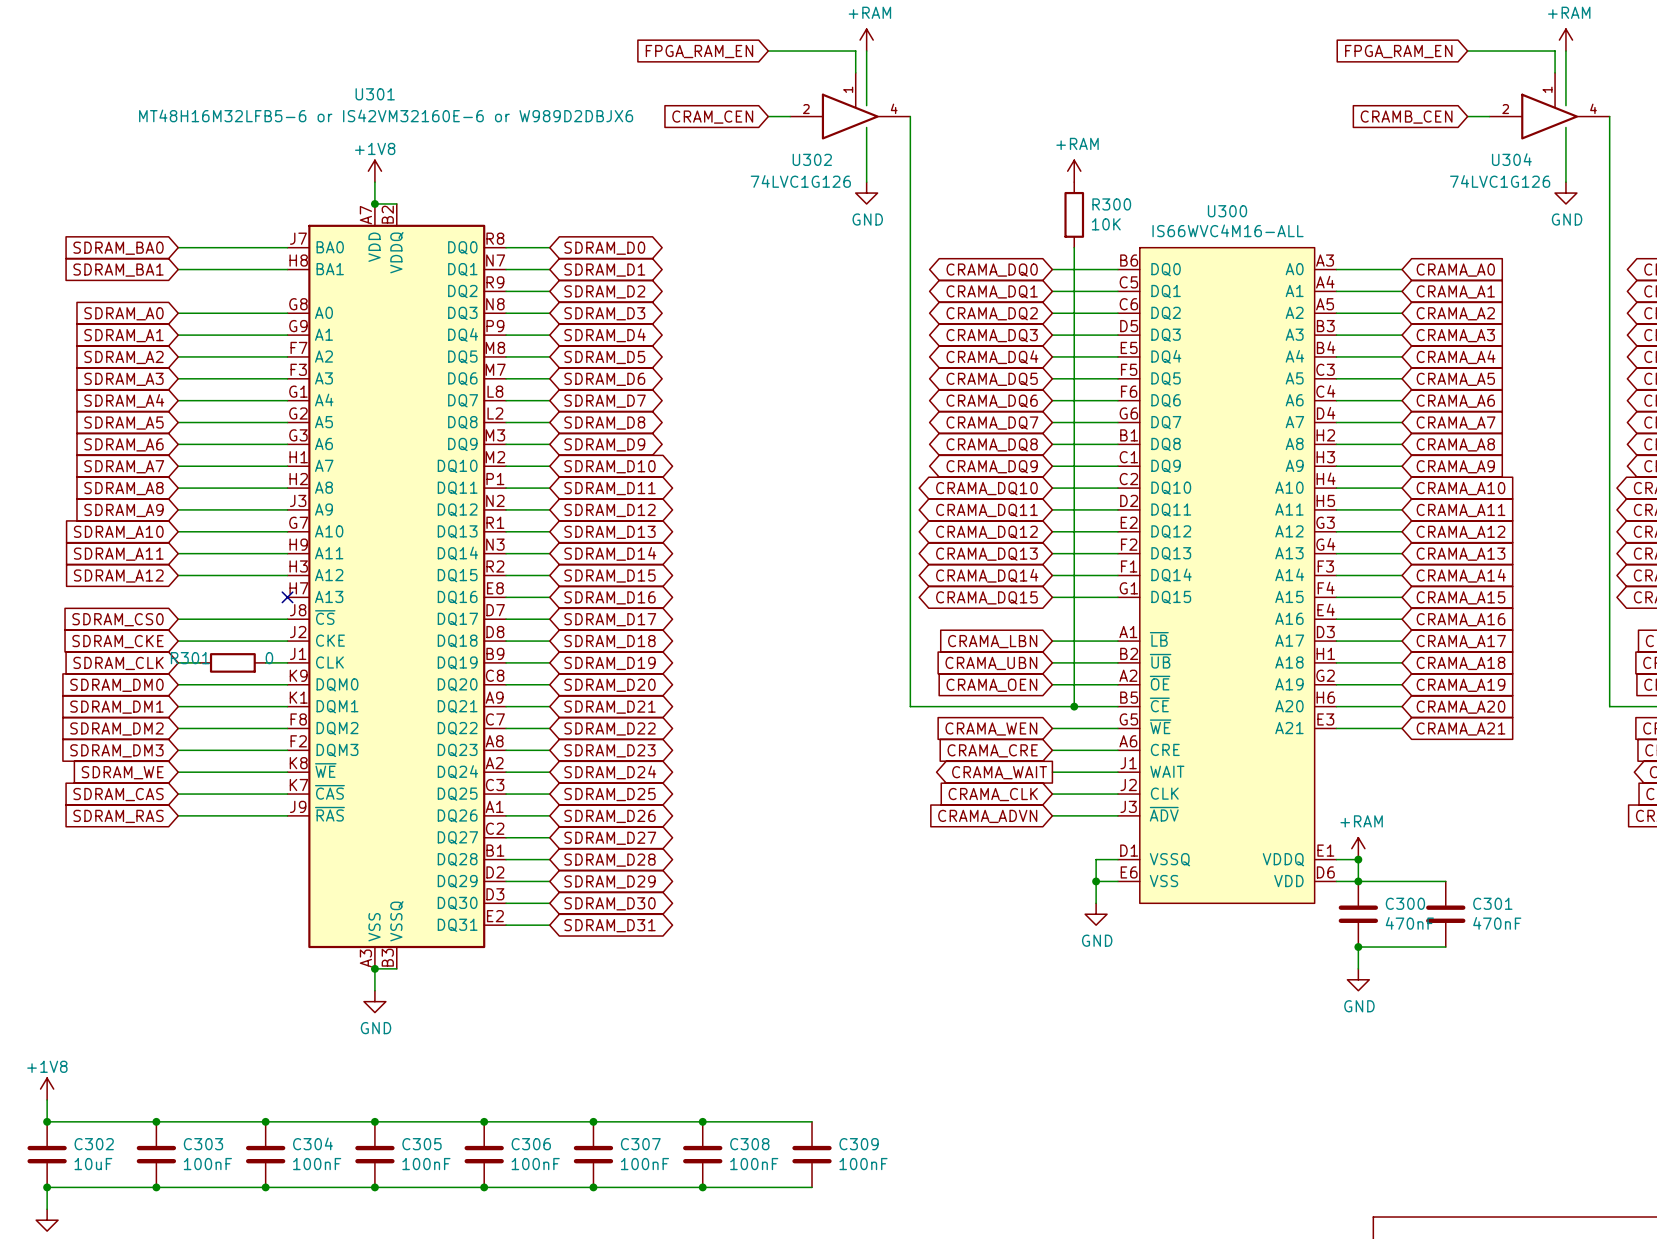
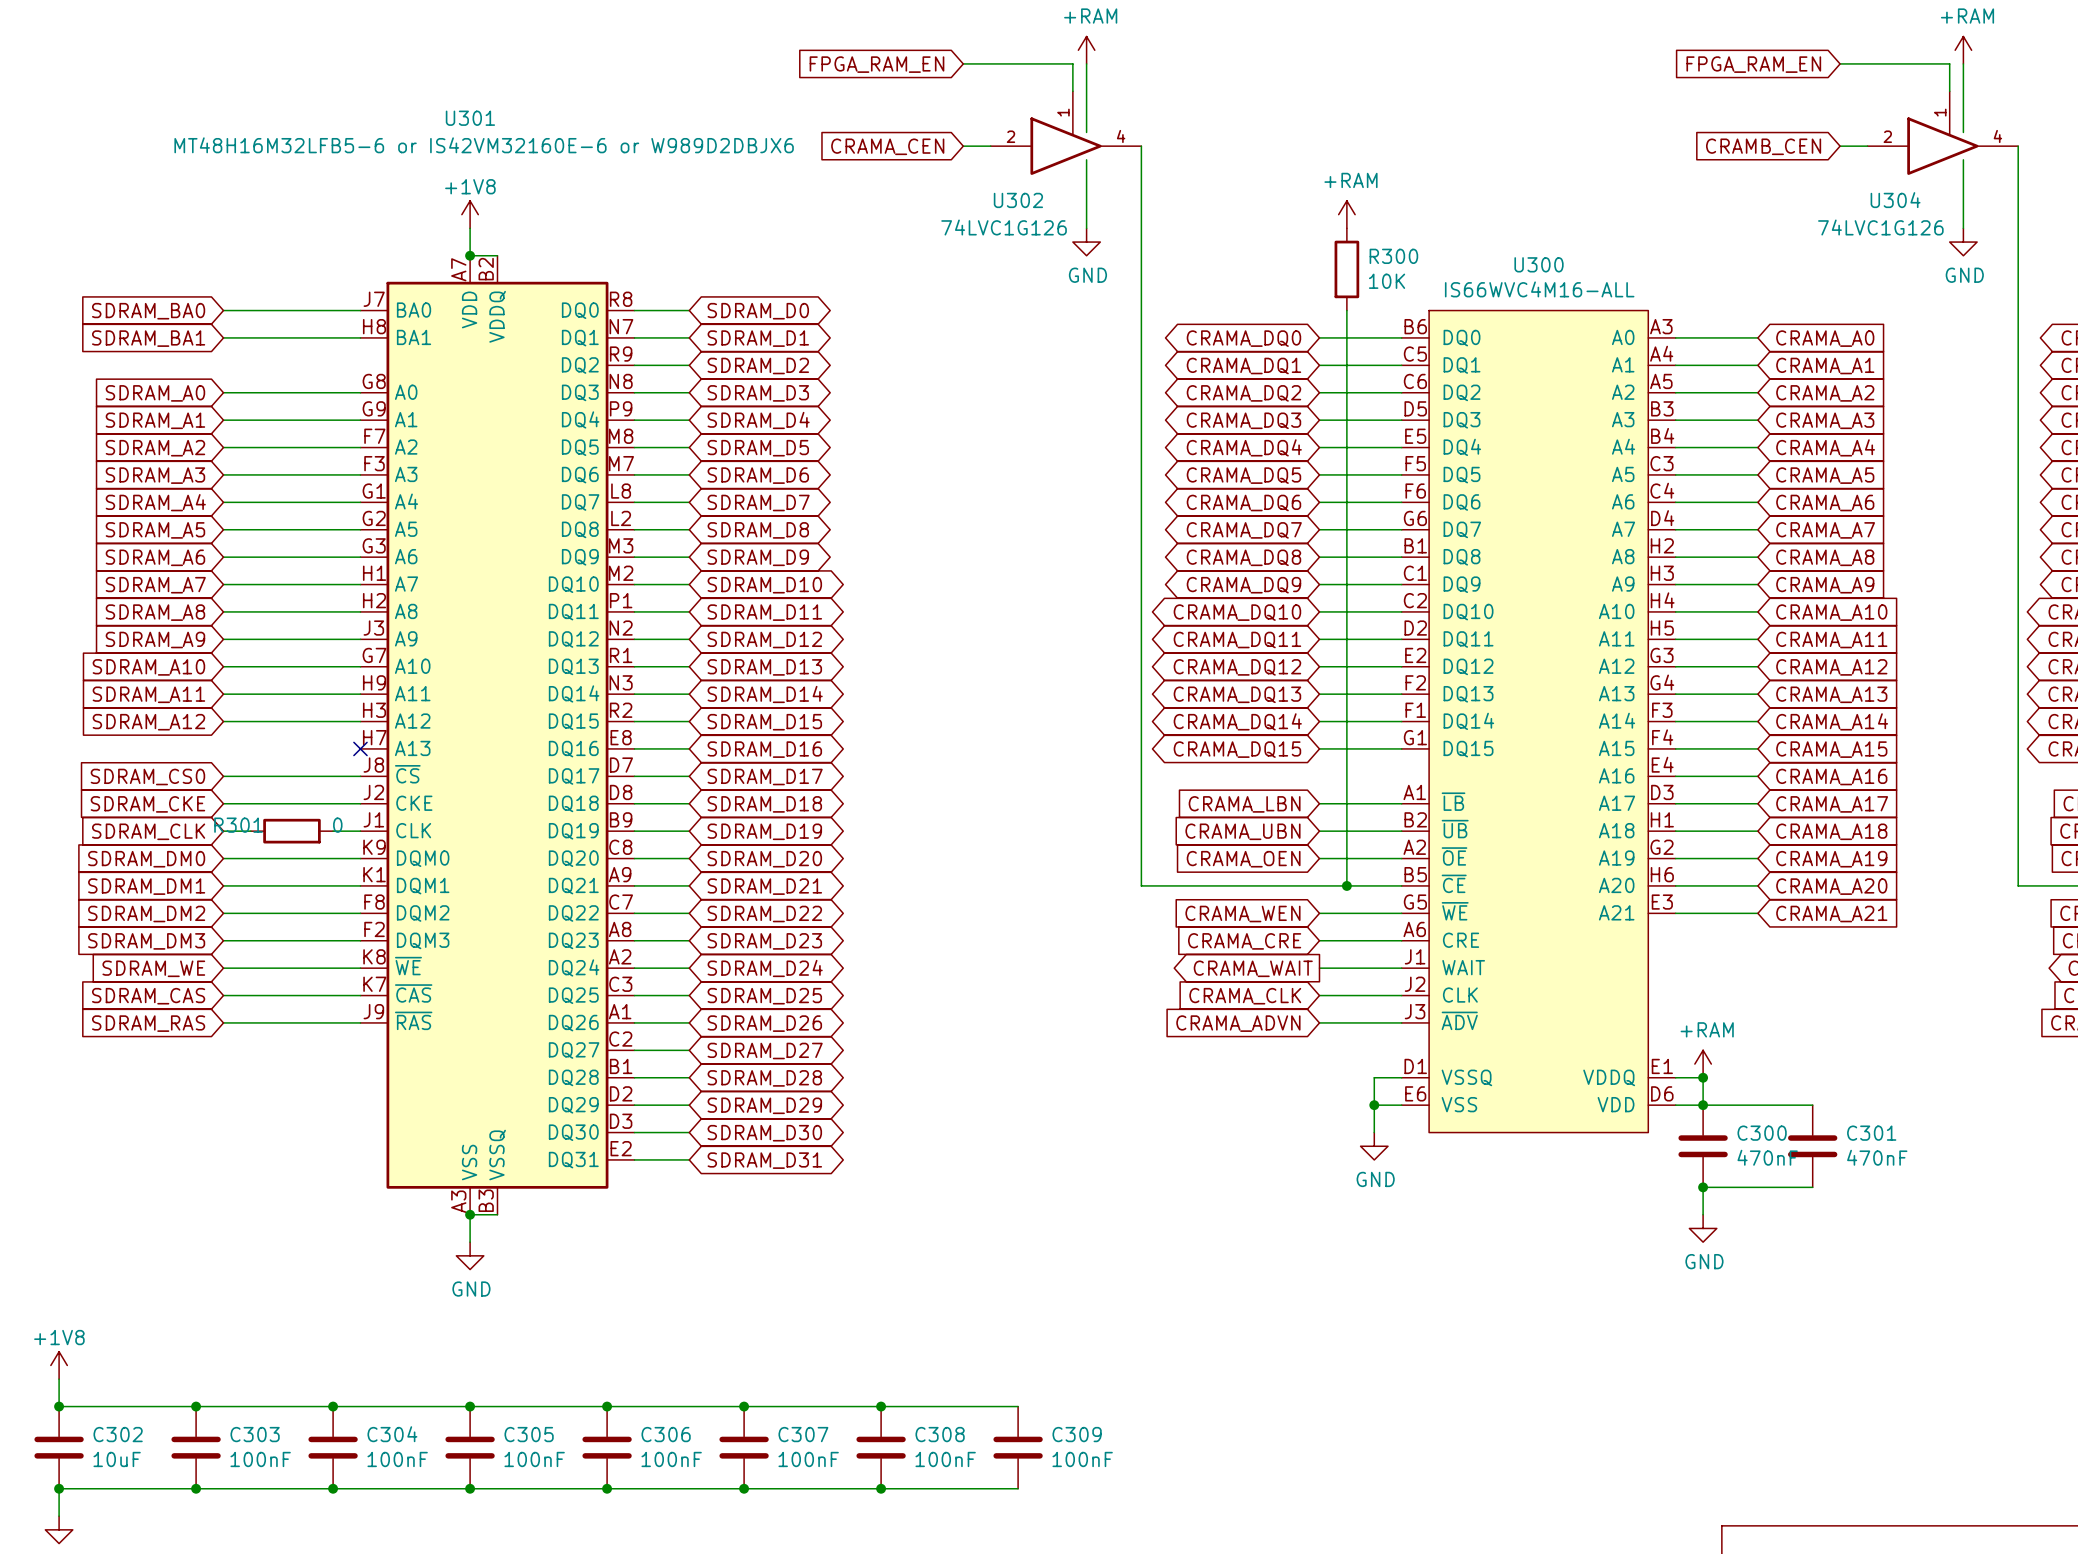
global label: CRAM_CEN (712, 117) -> CRAMA_CEN (887, 146)

